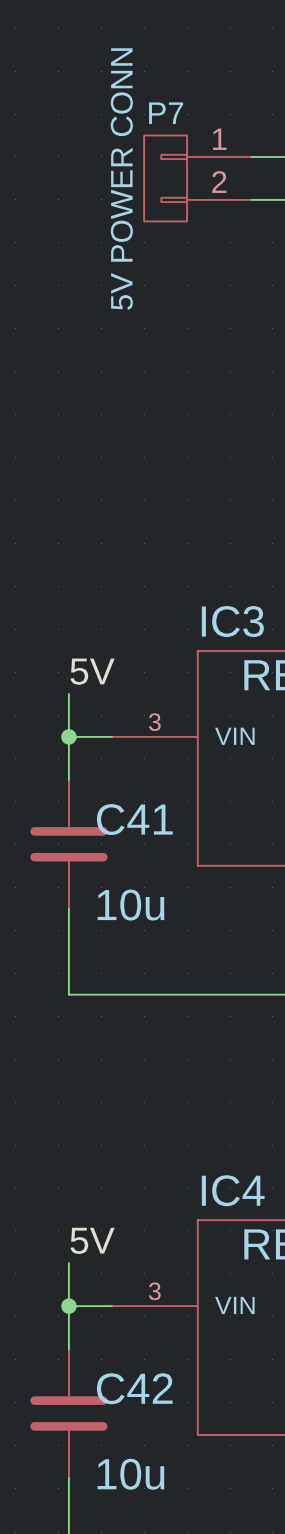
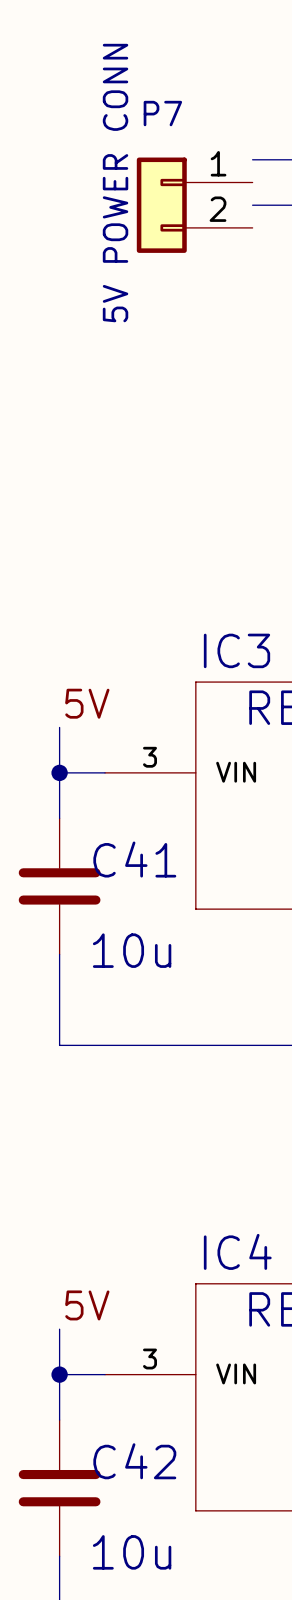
P7 symbol: [144, 135, 252, 222] -> [136, 157, 253, 253]

